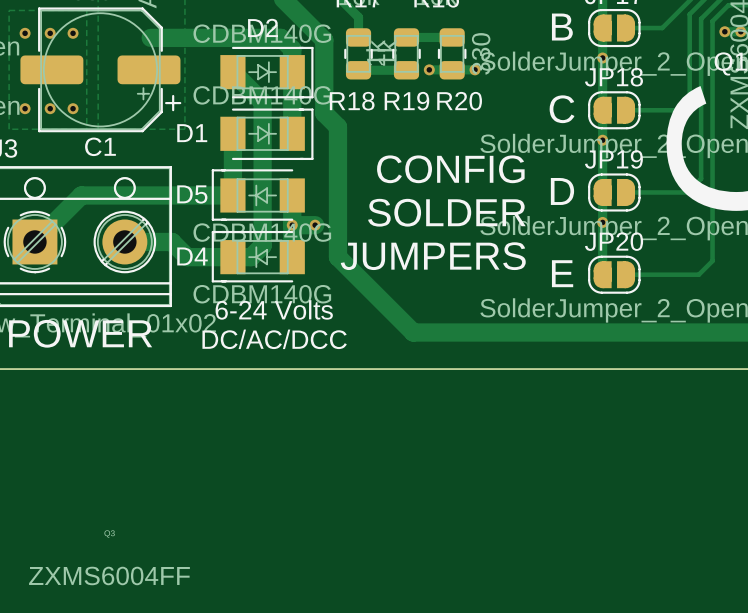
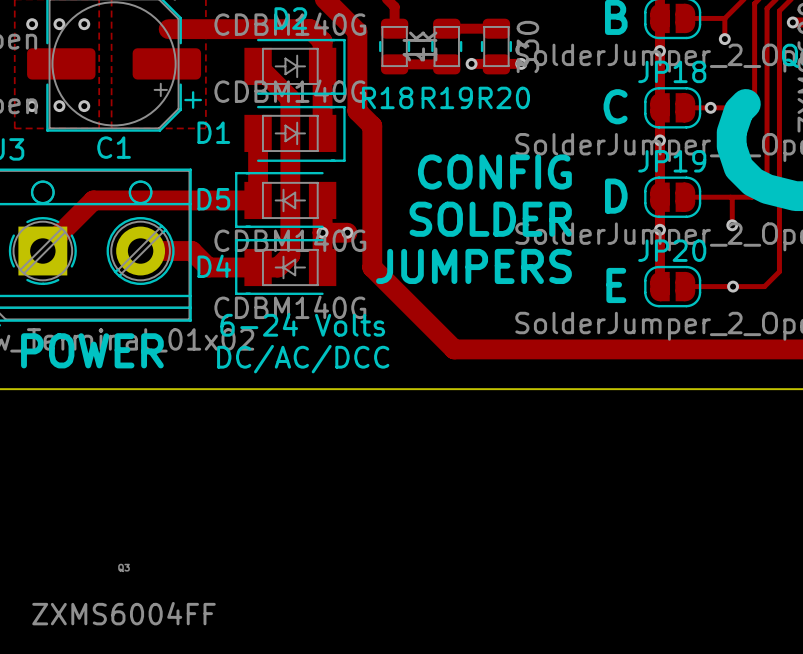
track: none -> (724, 18) (724, 39)
via: none -> (724, 39)
via: none -> (710, 107)
track: none -> (732, 198) (732, 225)
via: none -> (732, 225)
via: none -> (733, 286)

